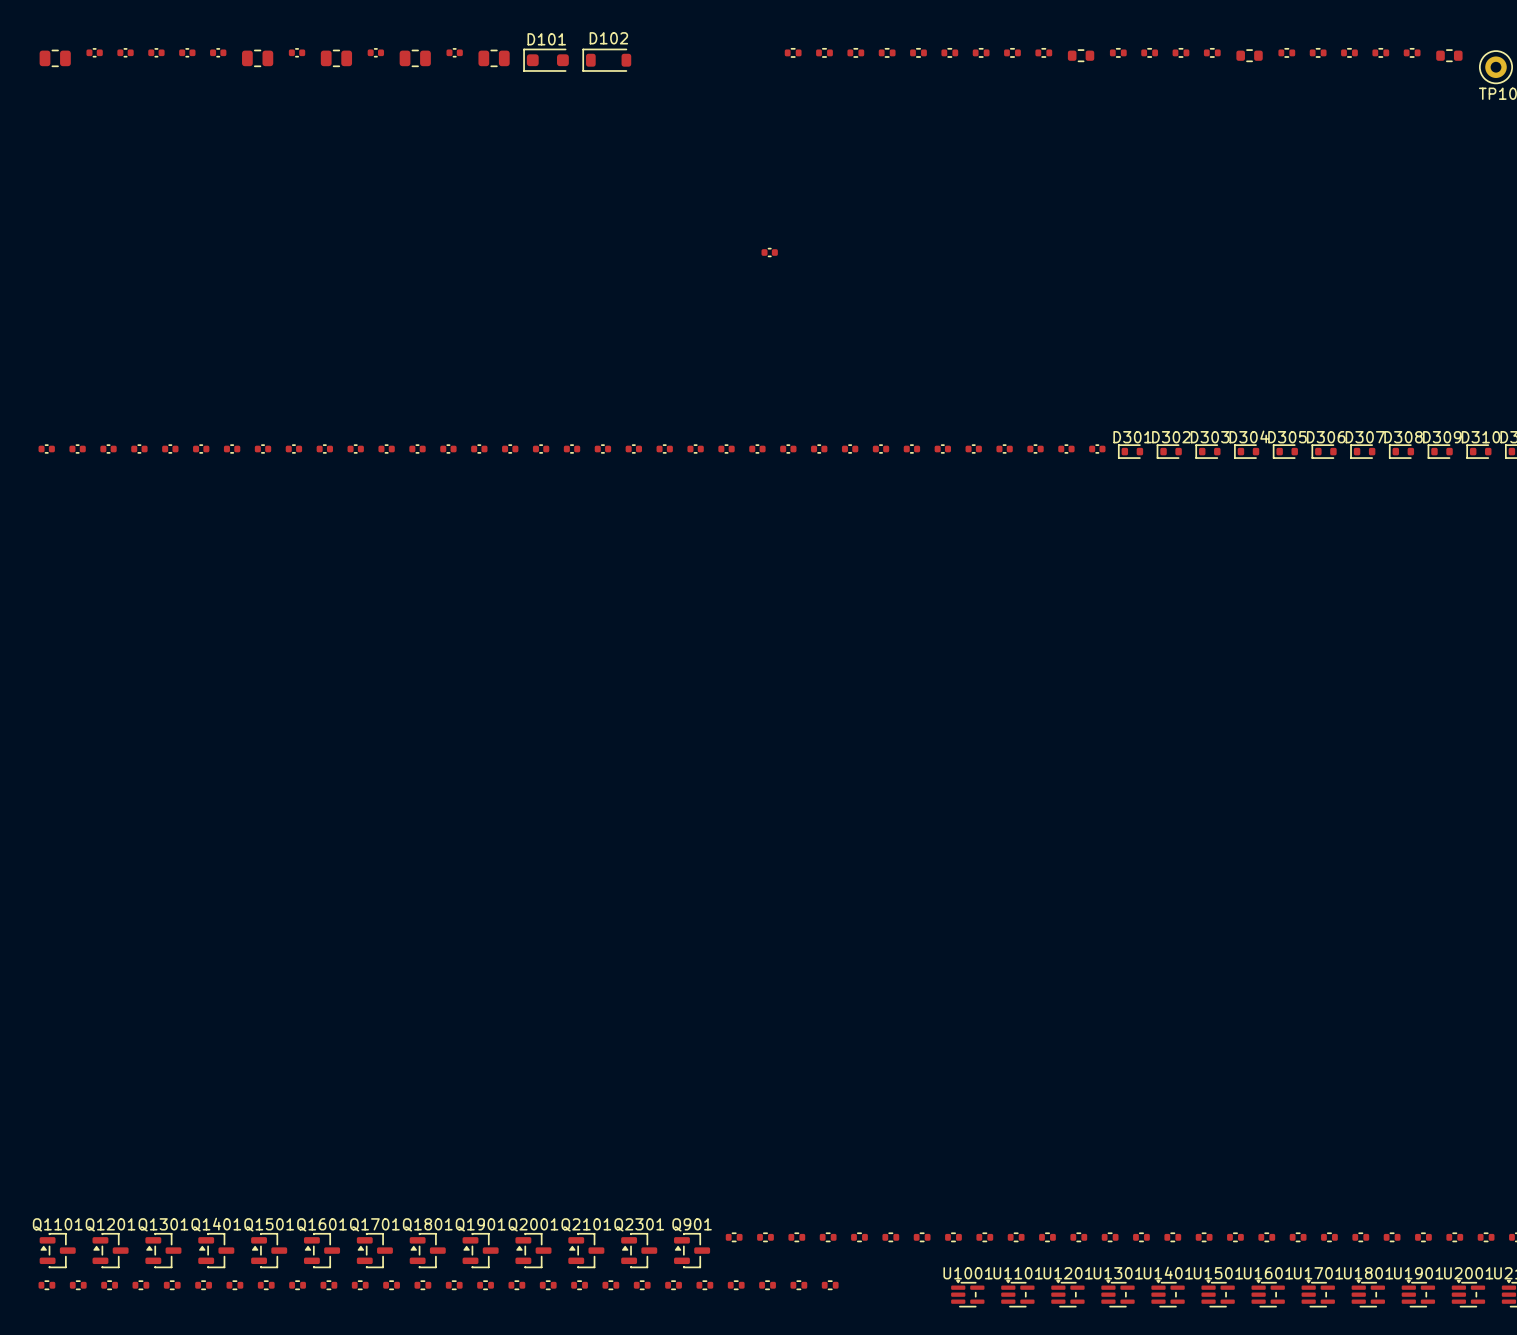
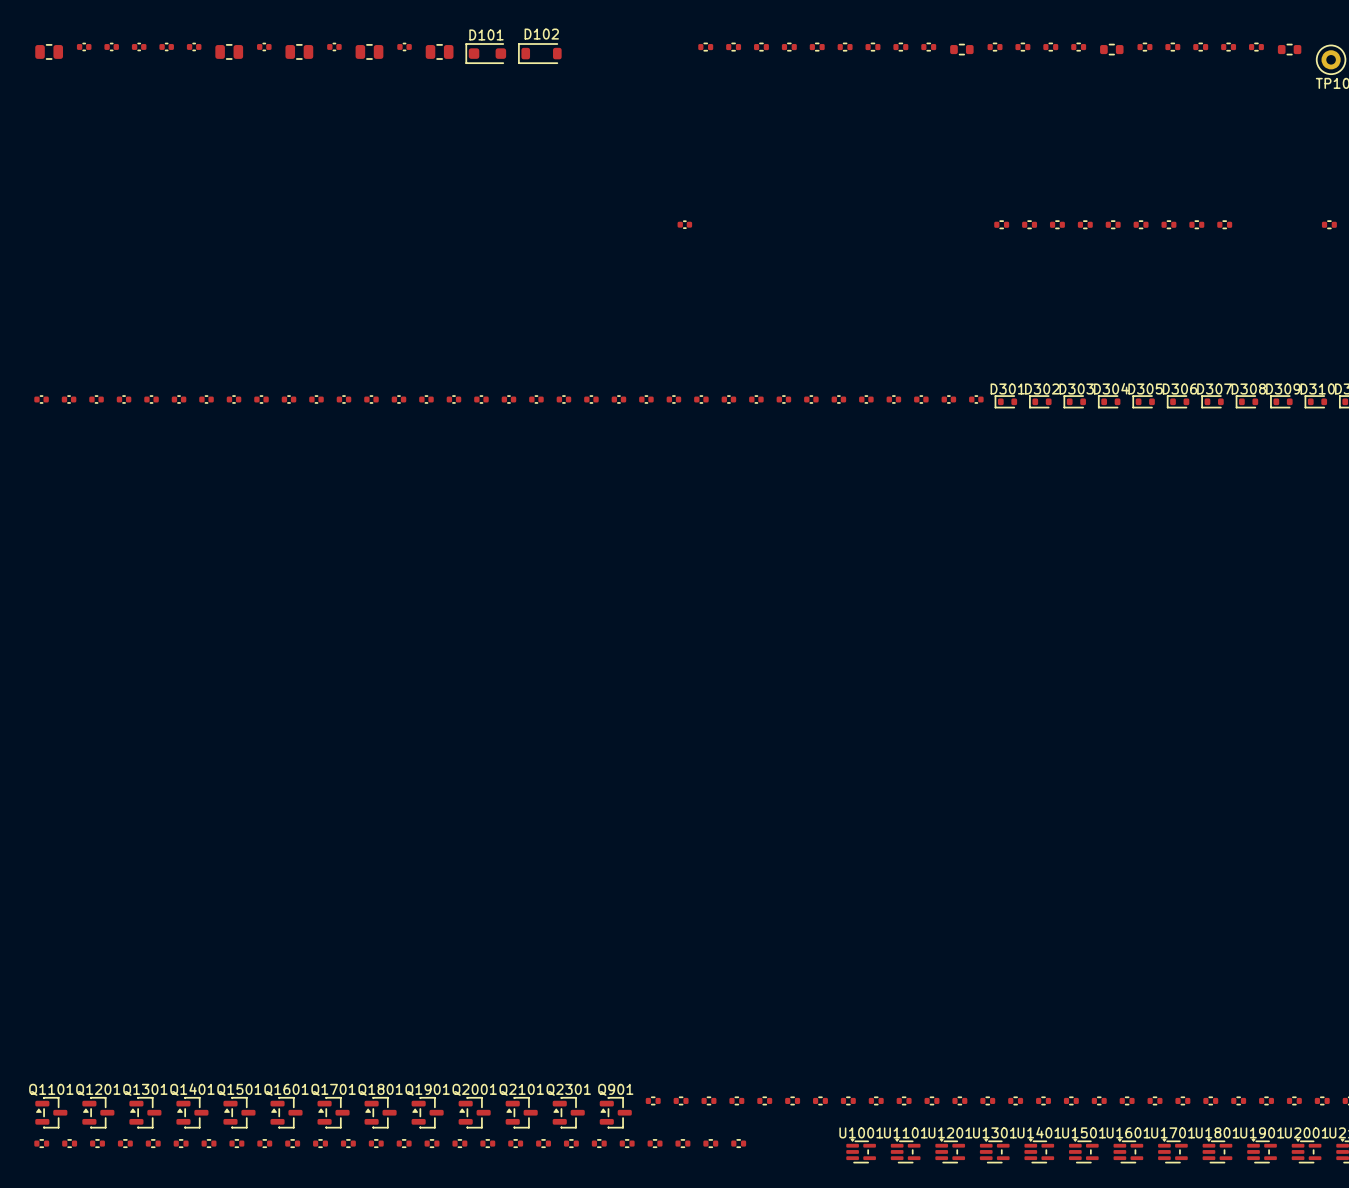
part: none -> (1001, 224)
part: none -> (1029, 224)
part: none -> (1057, 224)
part: none -> (1085, 224)
part: none -> (1113, 224)
part: none -> (1141, 224)
part: none -> (1168, 224)
part: none -> (1196, 224)
part: none -> (1224, 224)
part: none -> (1329, 224)

